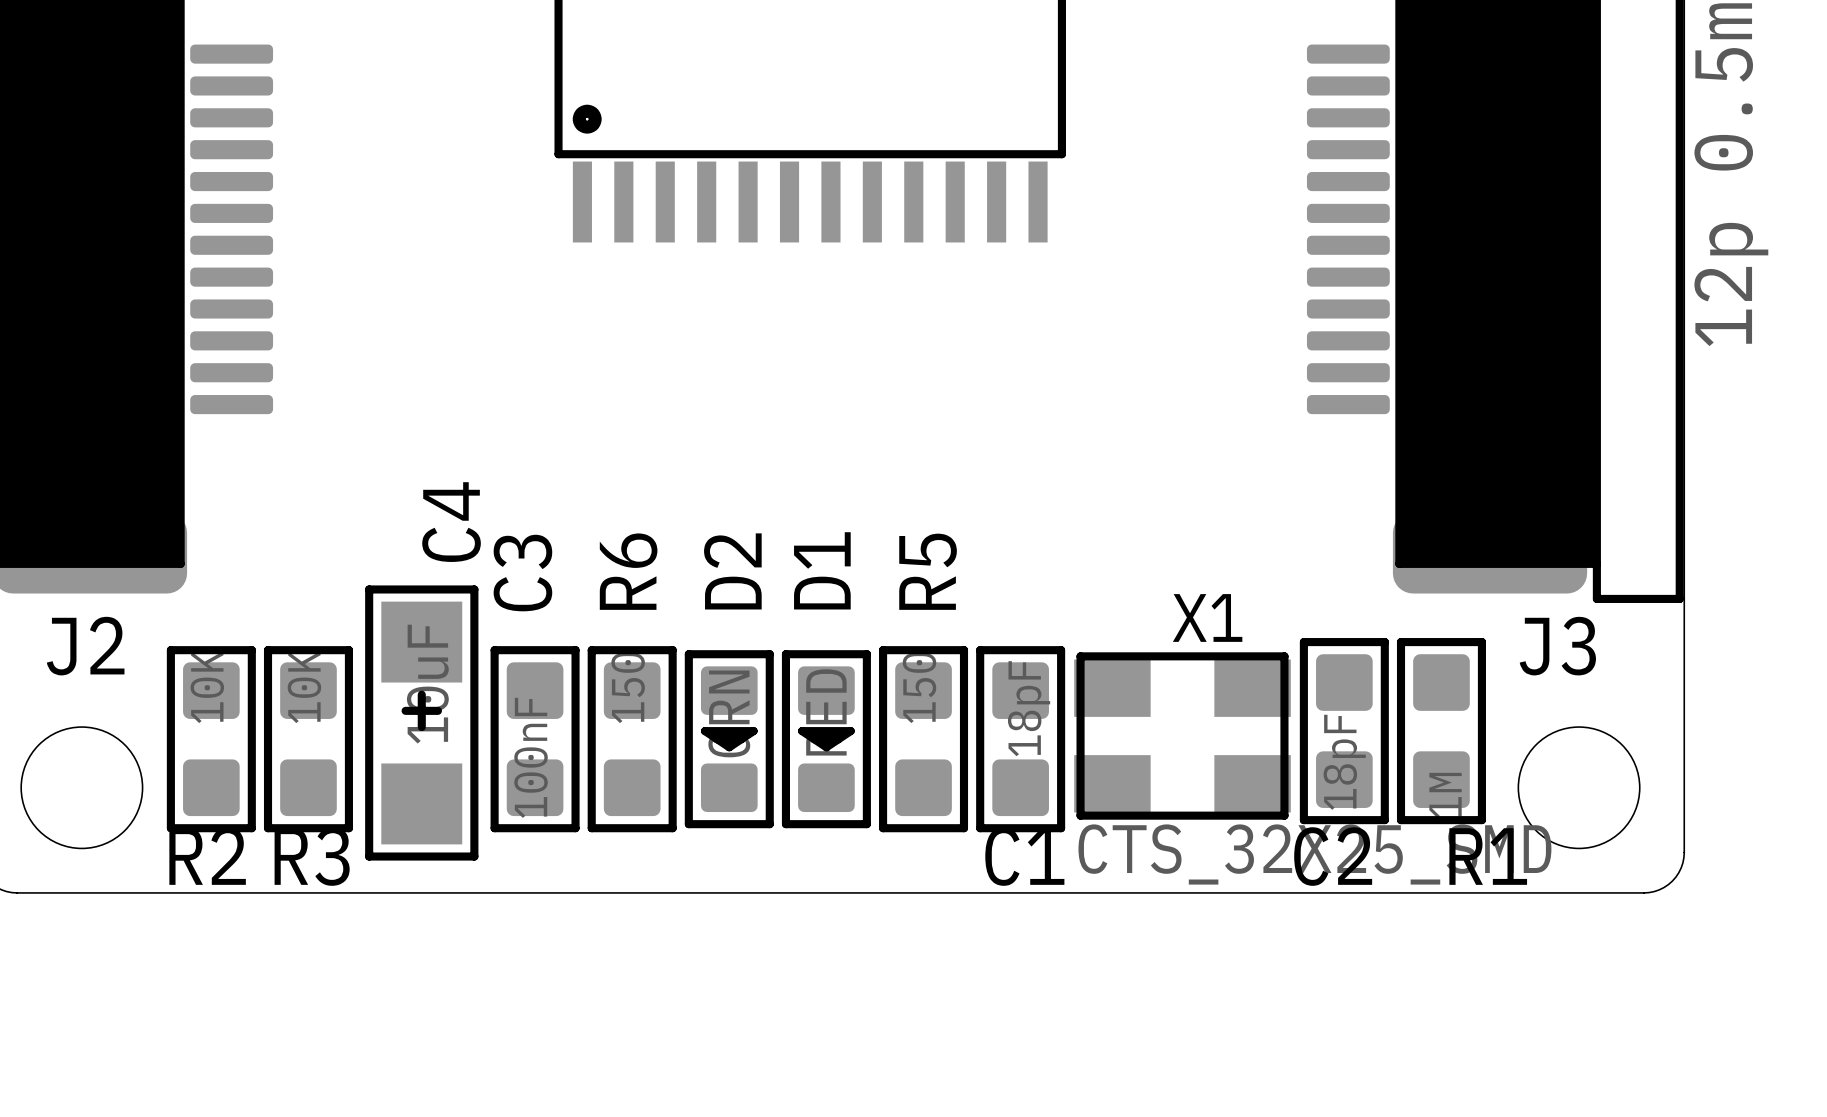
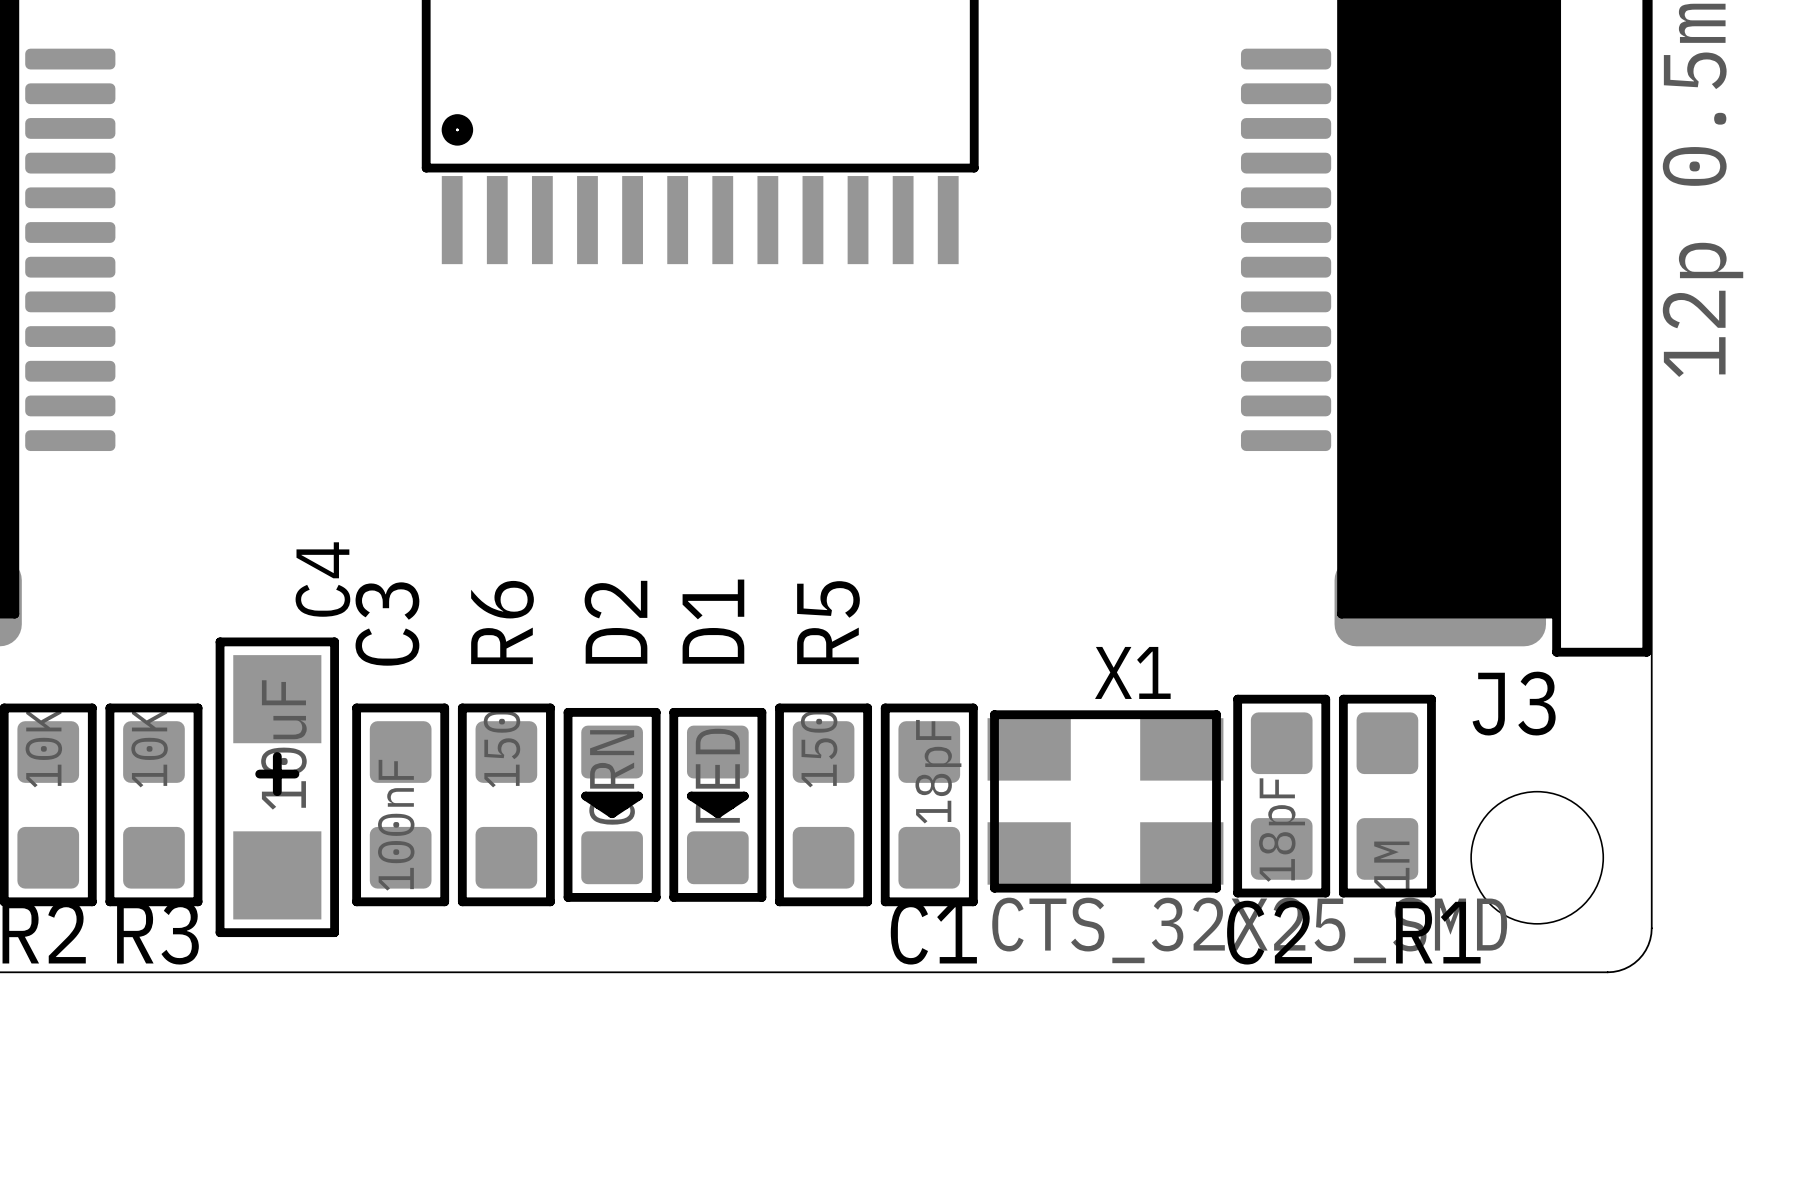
C4 name position: C4 (451, 522) -> C4 (322, 579)

